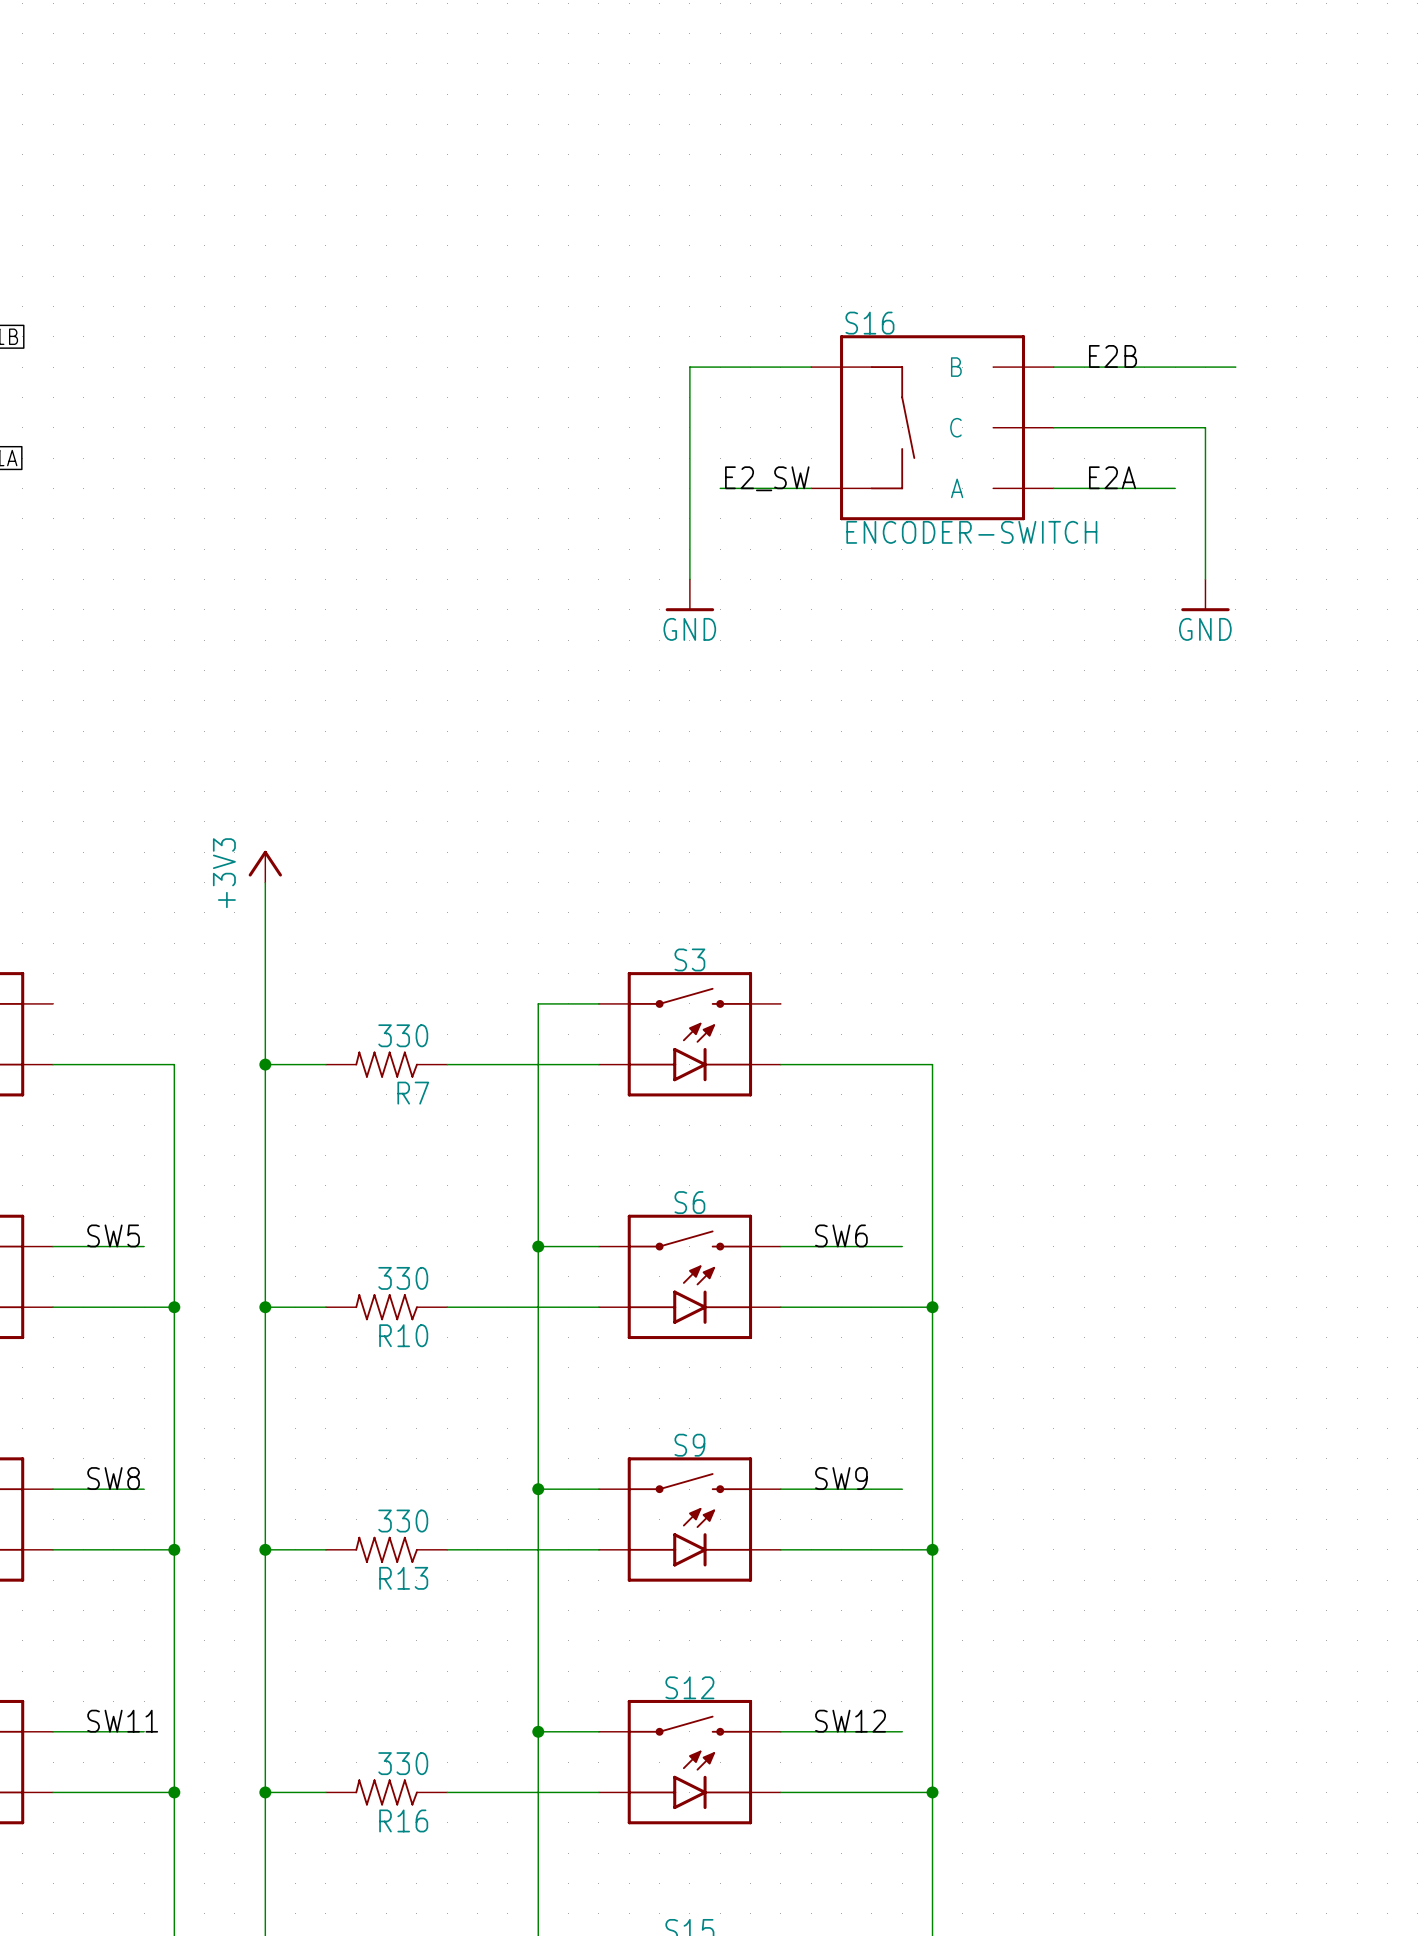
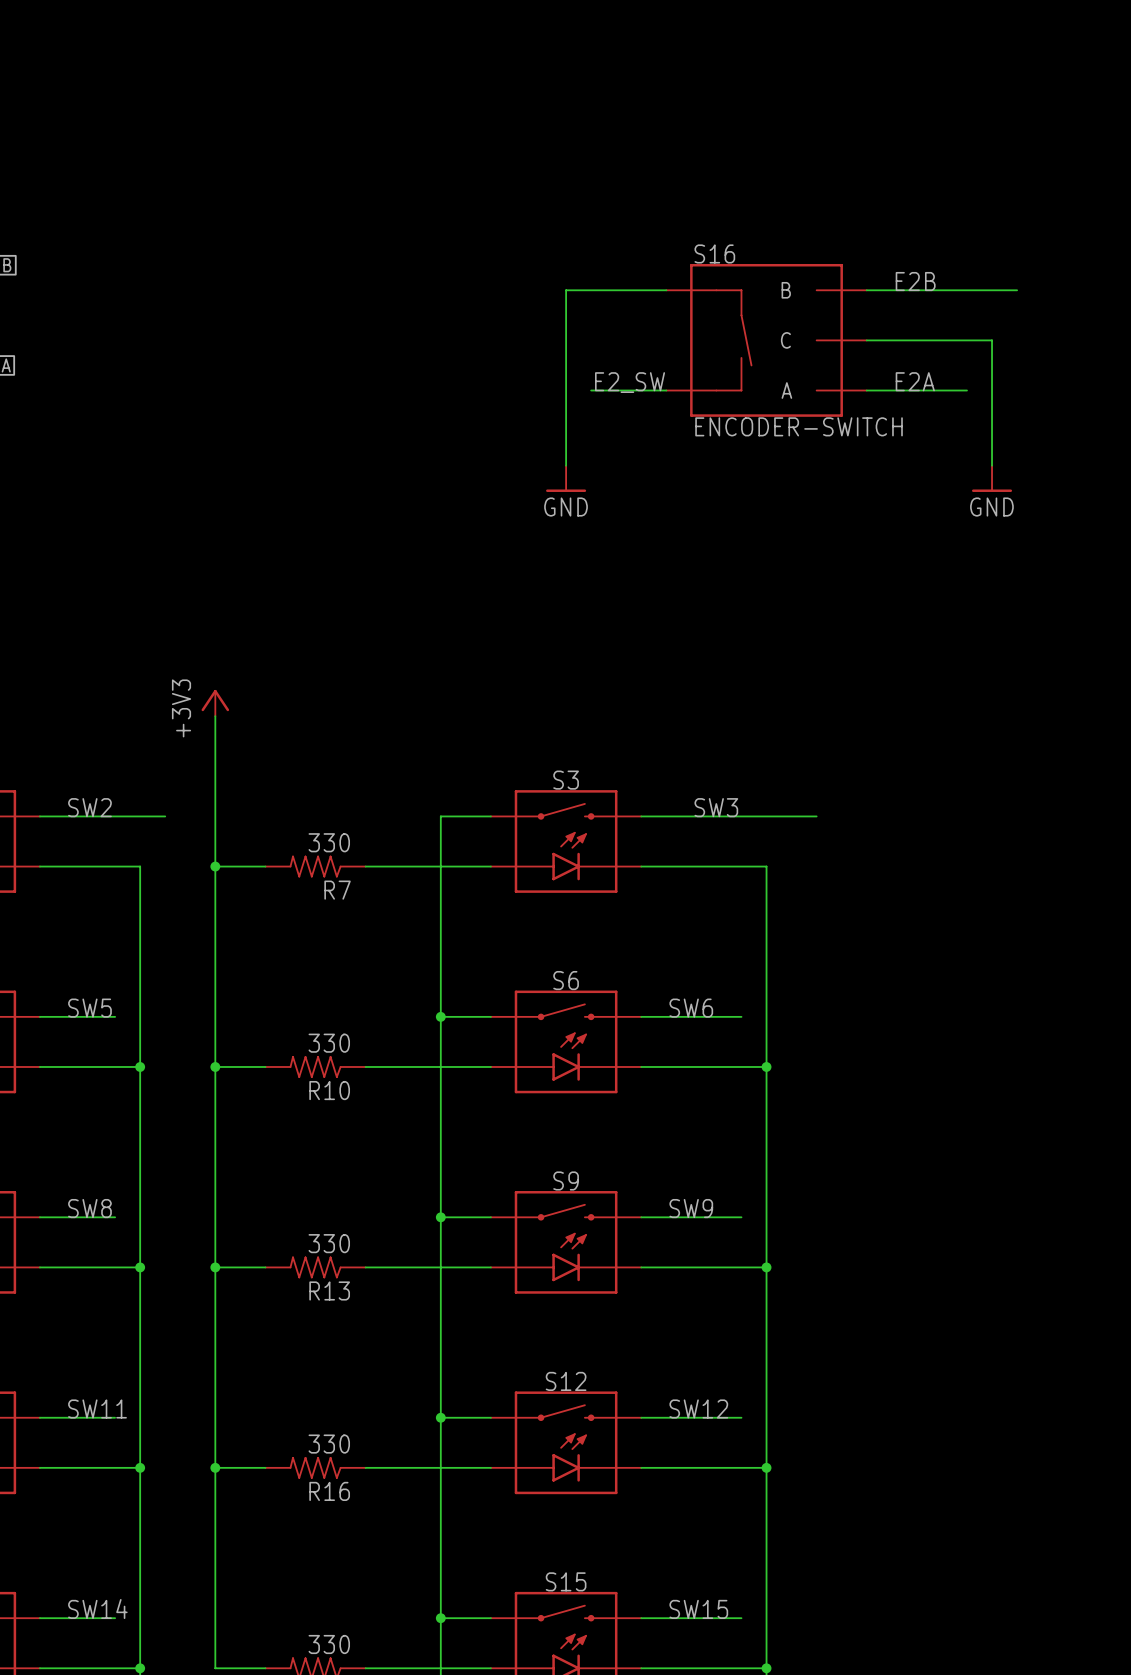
label: none -> SW2 (89, 807)
label: none -> SW3 (716, 807)
wire: none -> (39, 816) (165, 816)
wire: none -> (641, 816) (816, 816)

